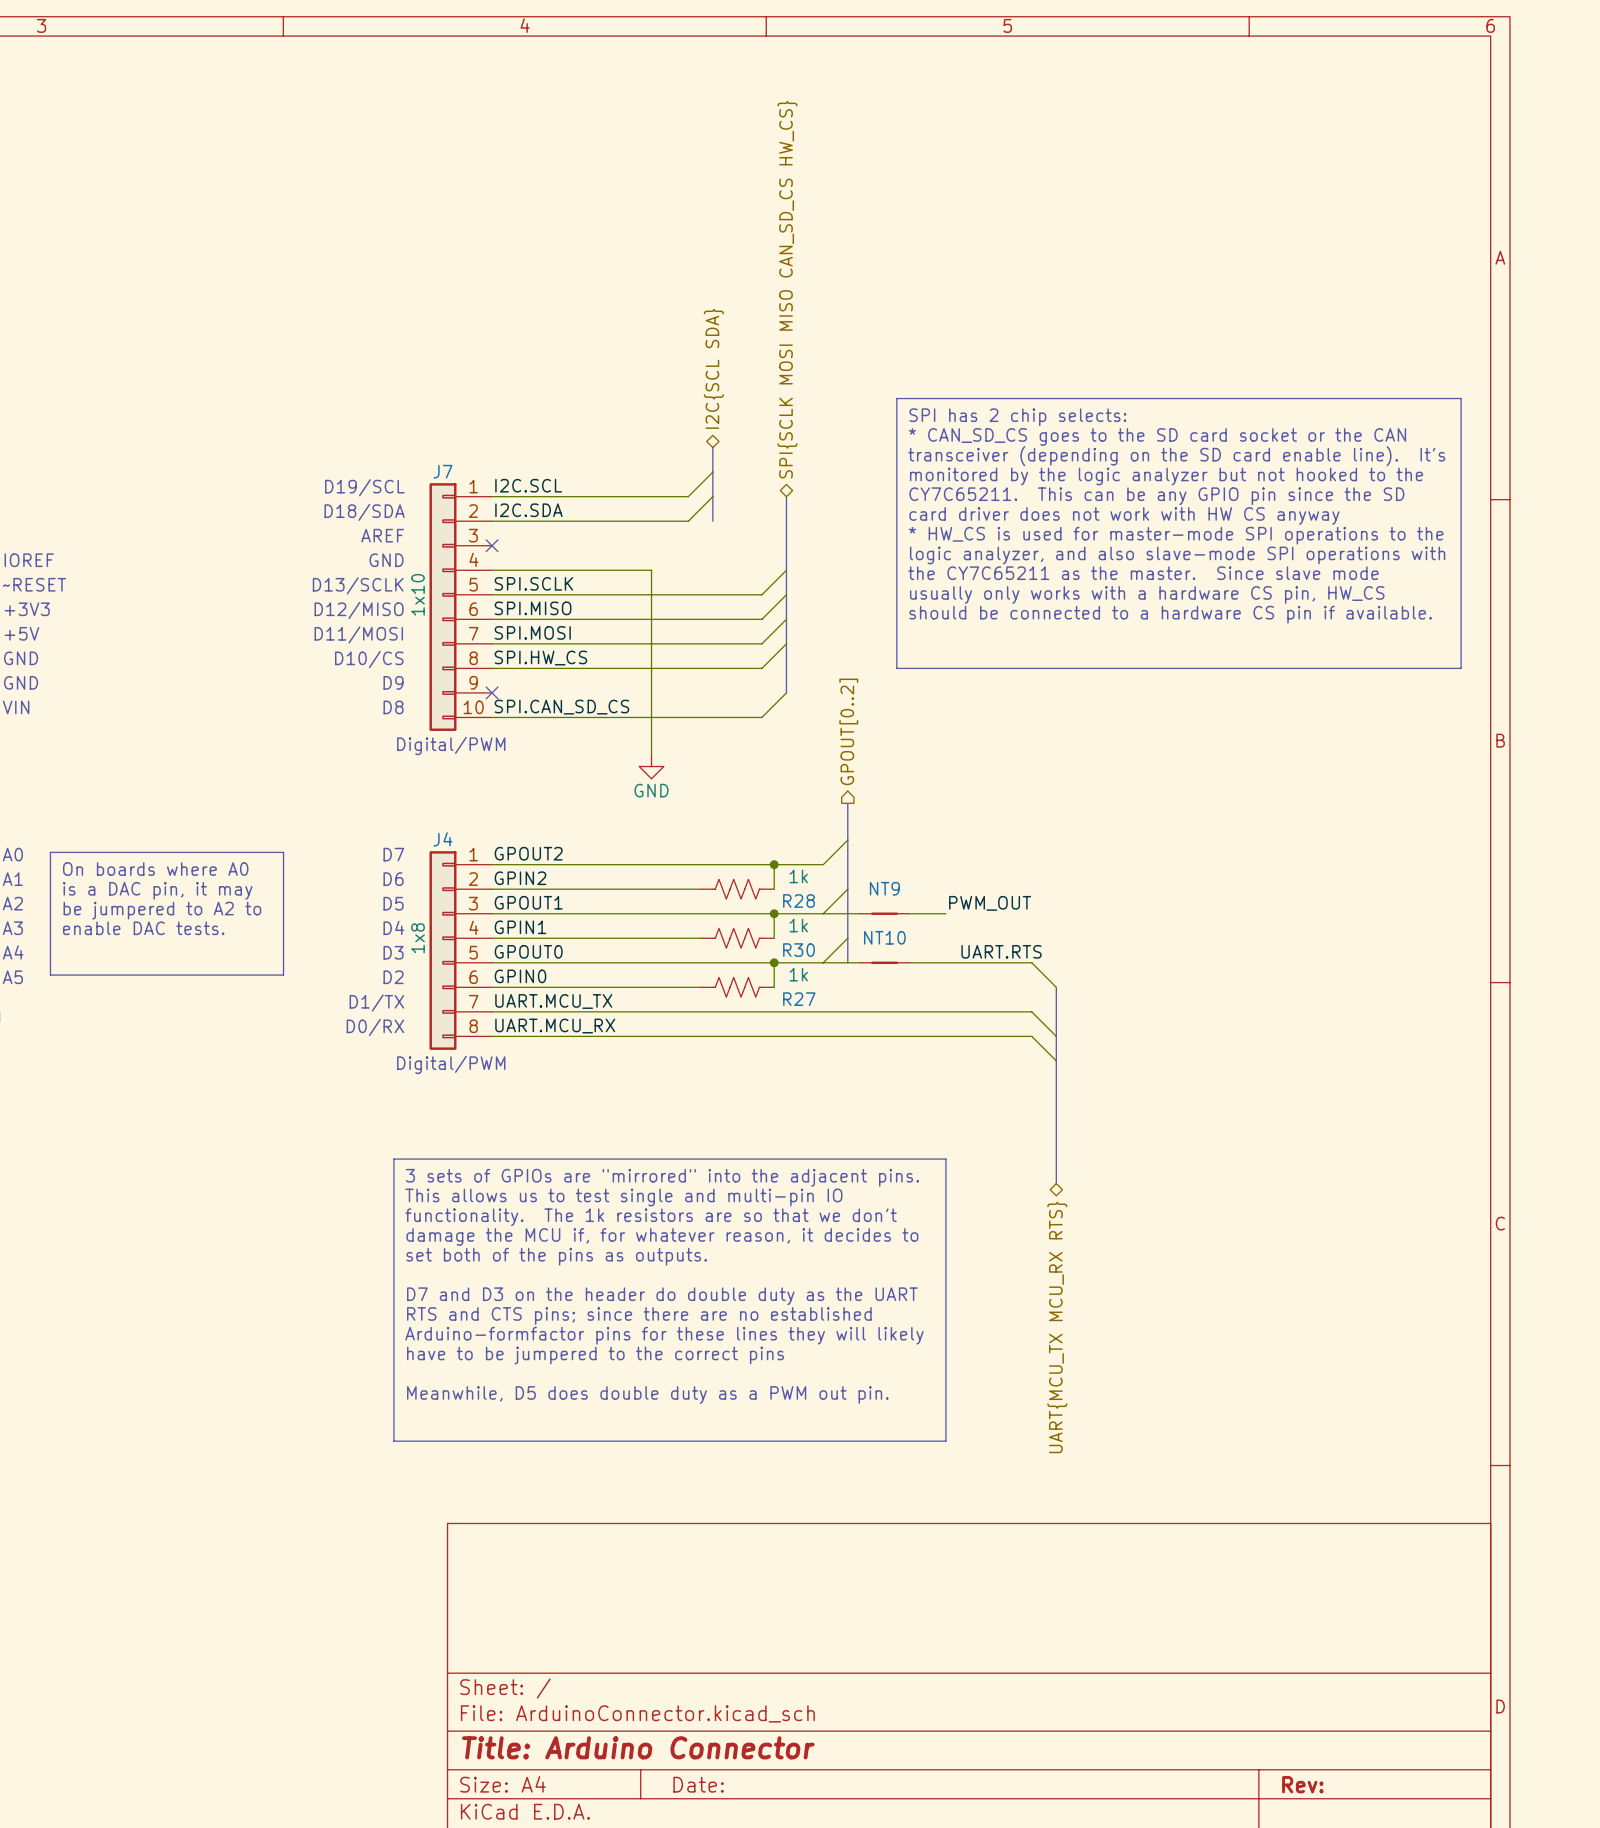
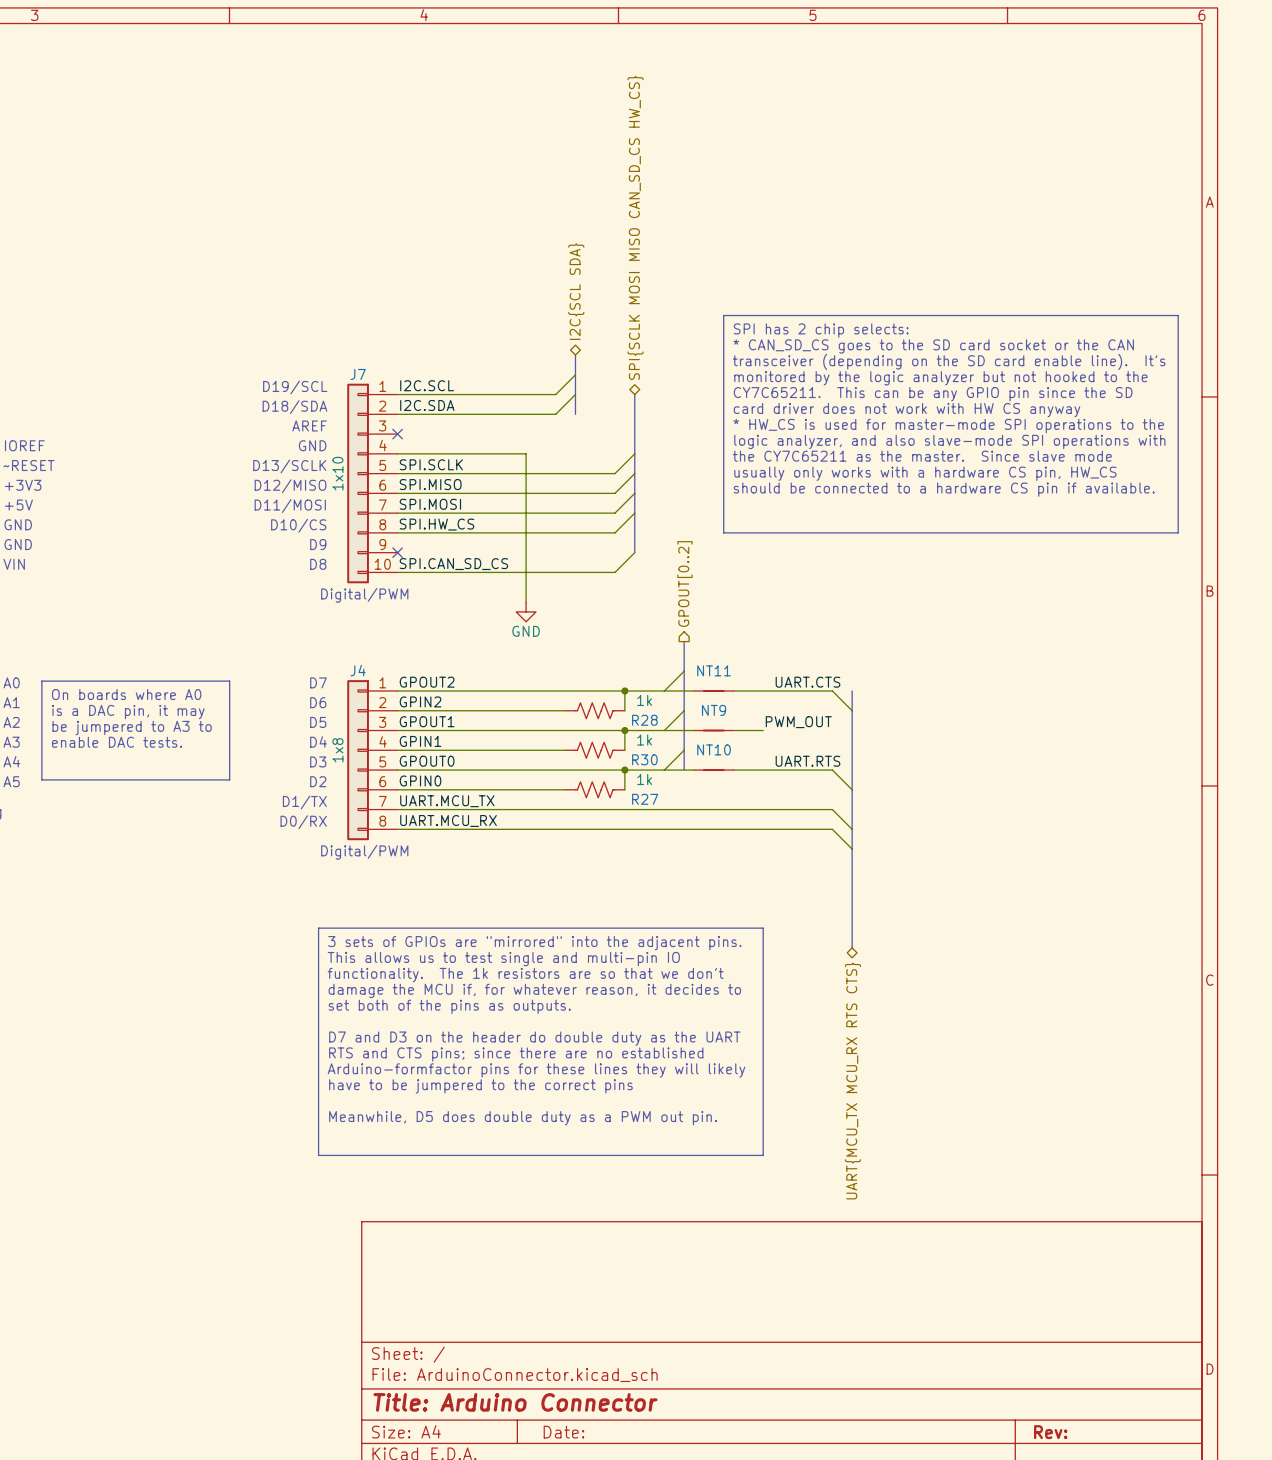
label: none -> UART.CTS (807, 682)
wire: none -> (664, 690) (694, 690)
NT11: none -> (713, 690)
wire: none -> (733, 690) (832, 690) (852, 710)
bus: none -> (852, 690) (852, 789)
text: be jumpered to A2 to (162, 910) -> be jumpered to A3 to (132, 727)
hierarchical label: UART{MCU_TX MCU_RX RTS} (1057, 1327) -> UART{MCU_TX MCU_RX RTS CTS} (852, 1080)

